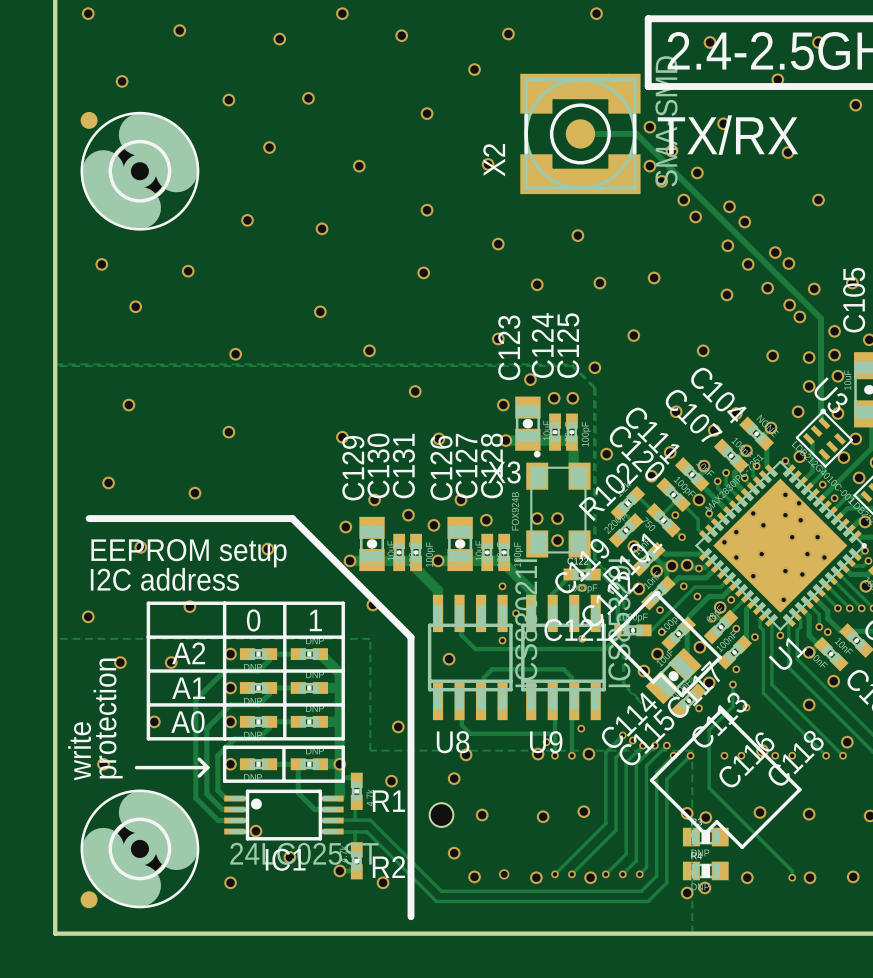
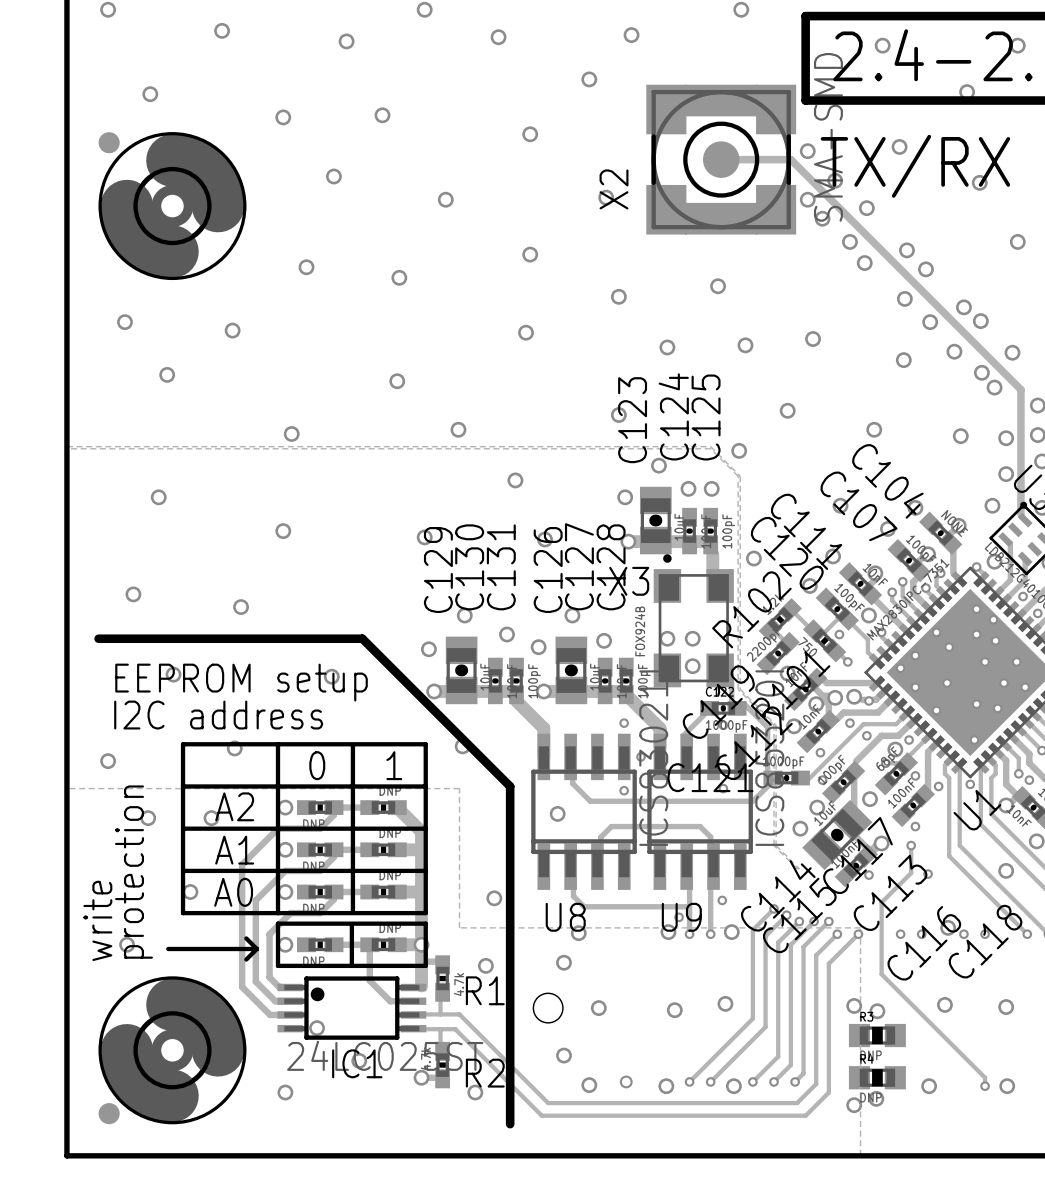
line: none -> (98, 638) (109, 638)
line: (655, 593) (610, 638) (653, 682) (660, 674) (682, 695) (720, 657) (655, 593) -> none
line: (721, 710) (651, 780) (704, 833) (716, 821) (742, 847) (799, 789) (721, 710) -> none
line: (411, 908) (411, 916) -> none

